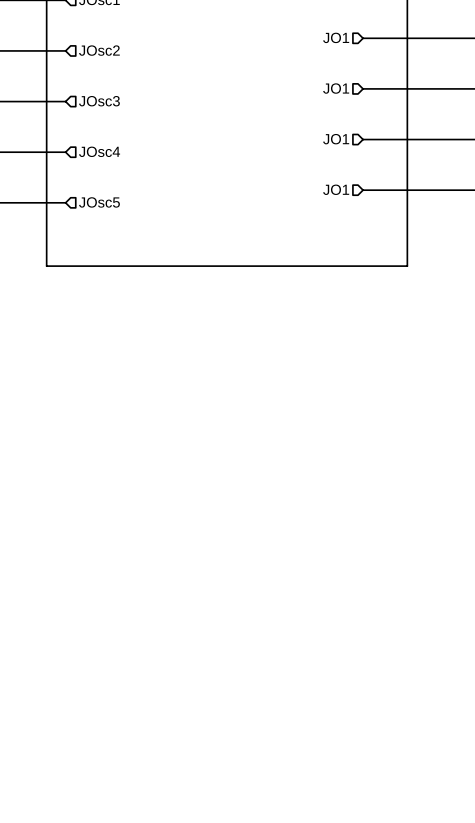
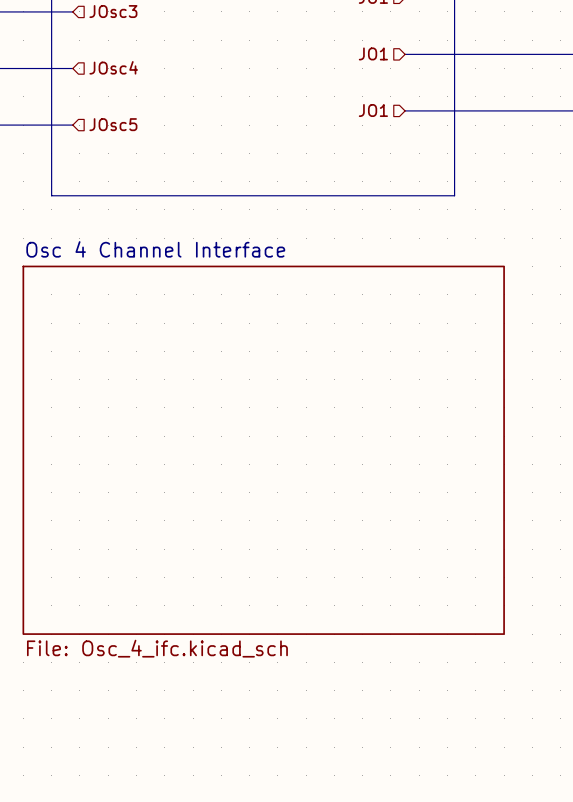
sheet Osc 4 Channel Interface: none -> File: Osc_4_ifc.kicad_sch (263, 450)

